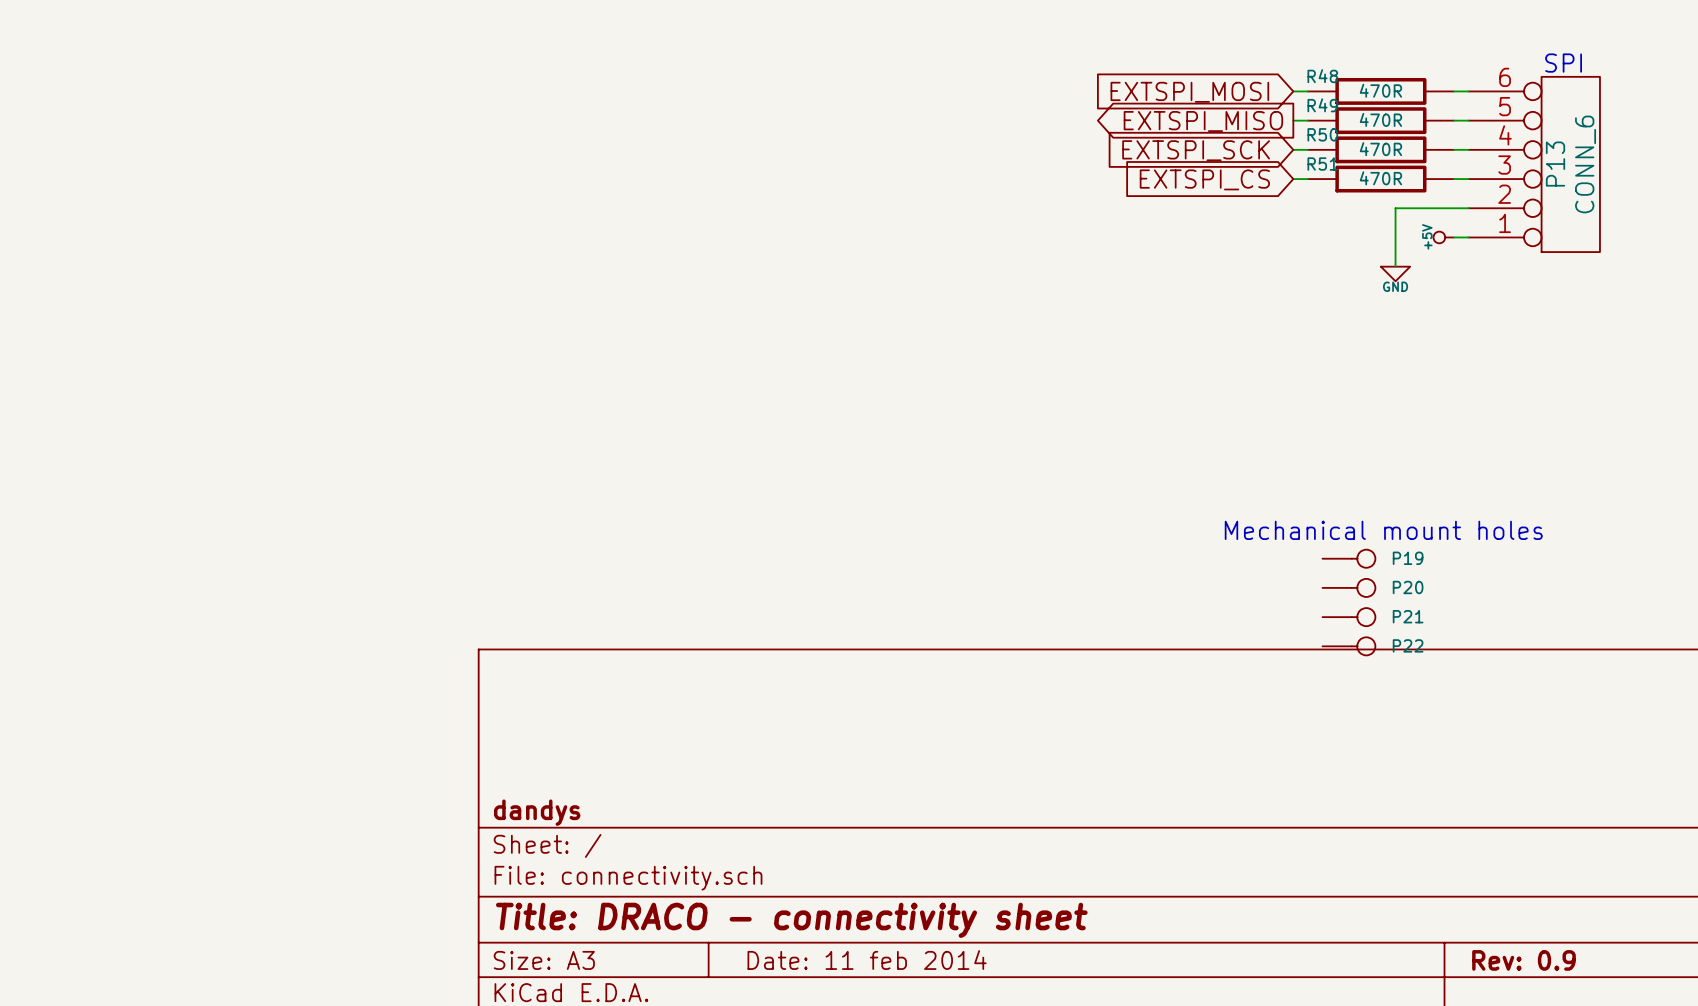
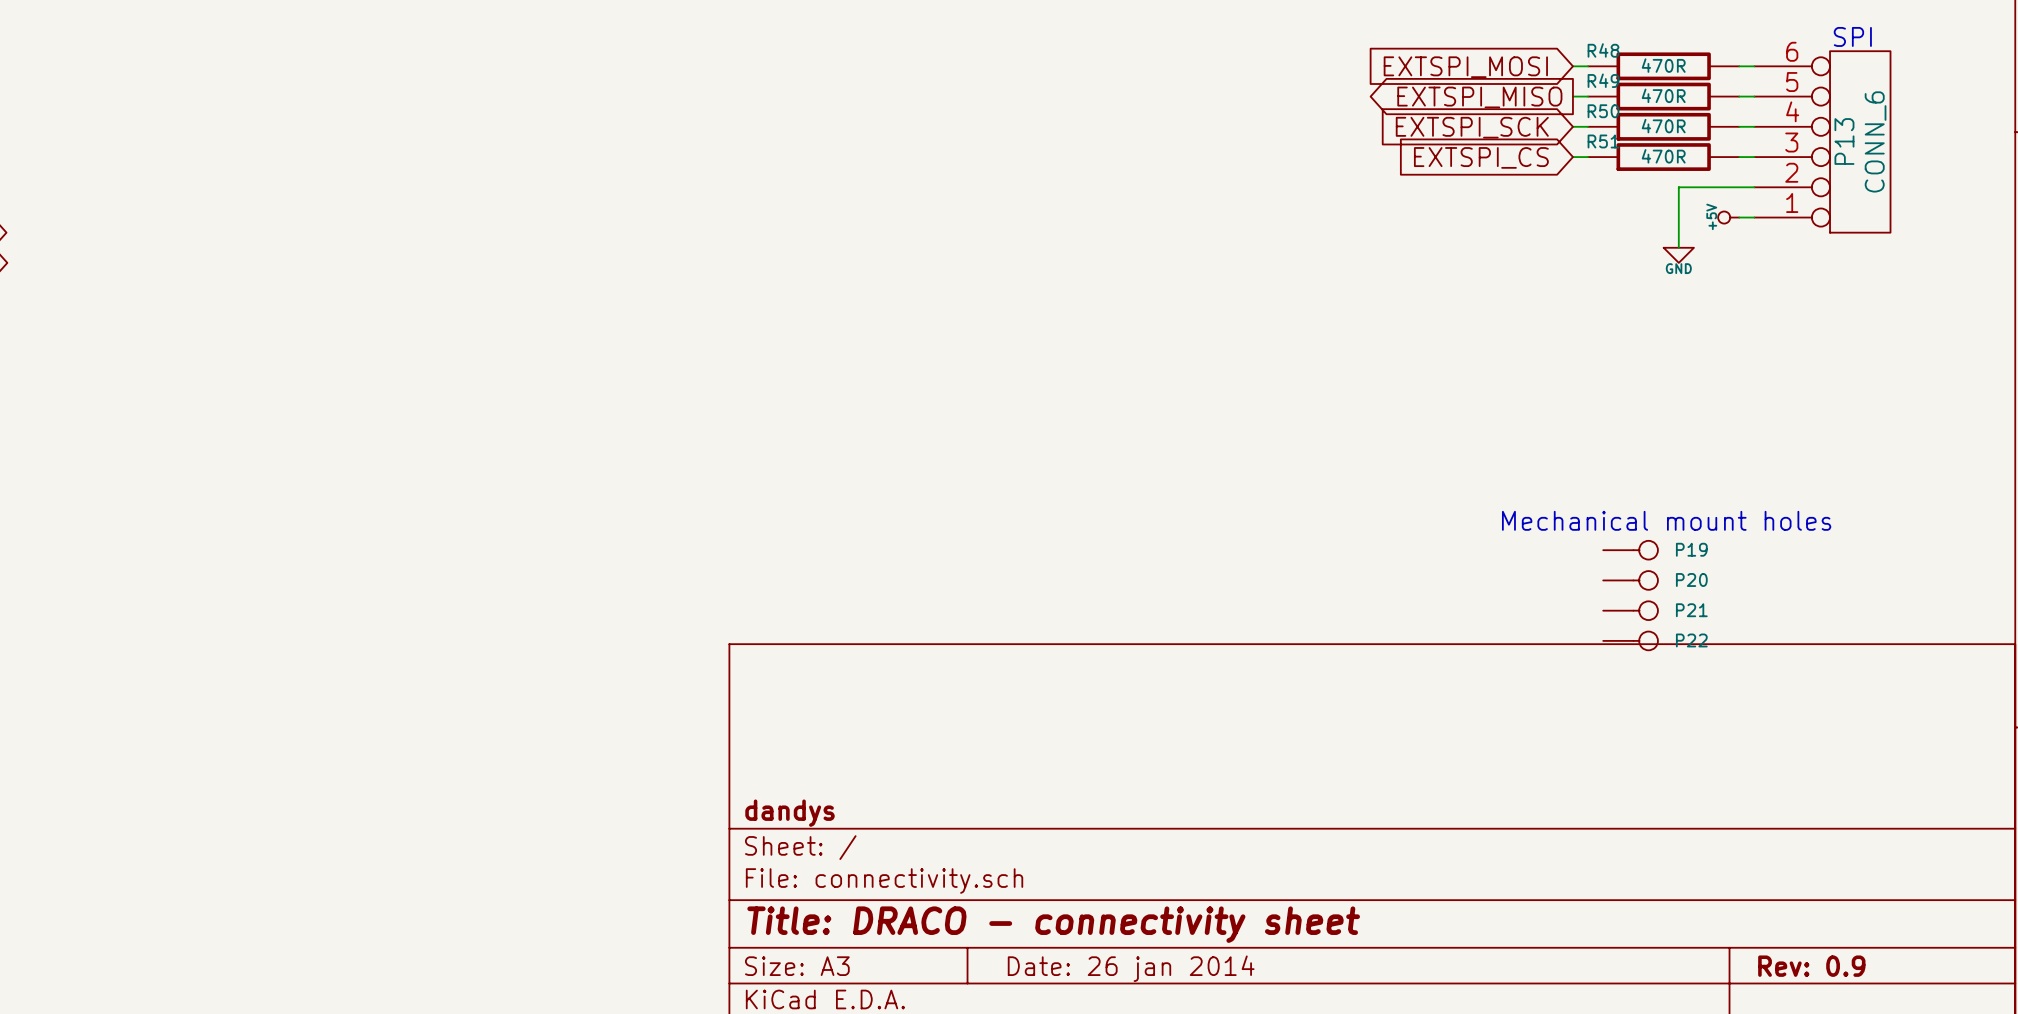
title block: Date: 11 feb 2014 (867, 960) -> Date: 26 jan 2014 (1131, 968)

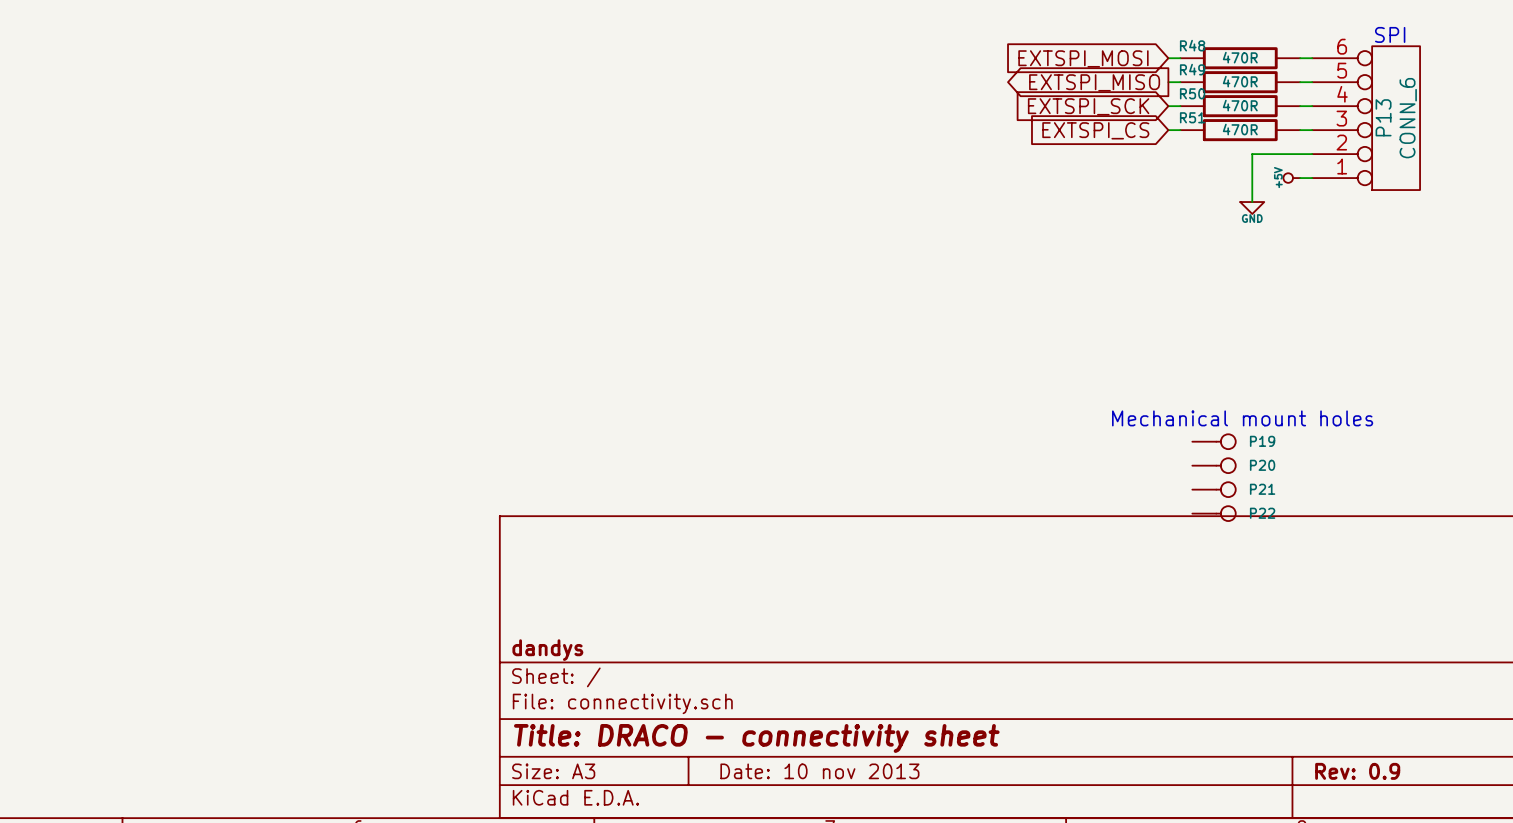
title block: Date: 26 jan 2014 (1131, 968) -> Date: 10 nov 2013 (819, 771)

